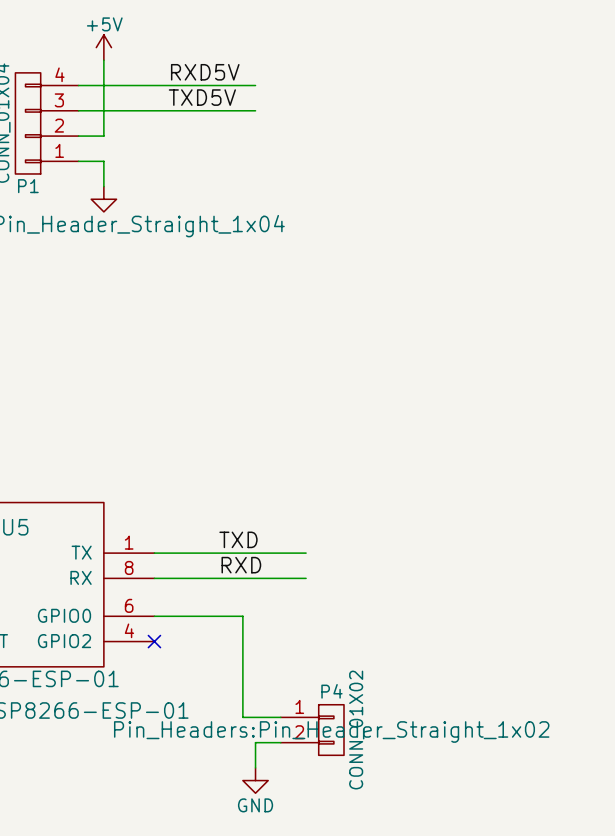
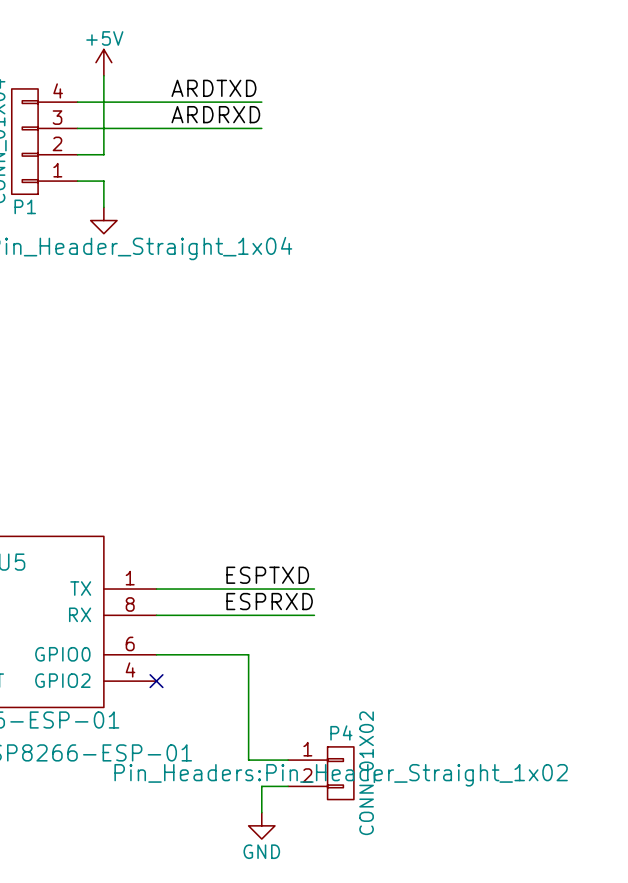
label: RXD5V (205, 72) -> ARDTXD (213, 88)
label: TXD5V (202, 97) -> ARDRXD (215, 114)
label: TXD (238, 539) -> ESPTXD (267, 575)
label: RXD (241, 565) -> ESPRXD (269, 601)

